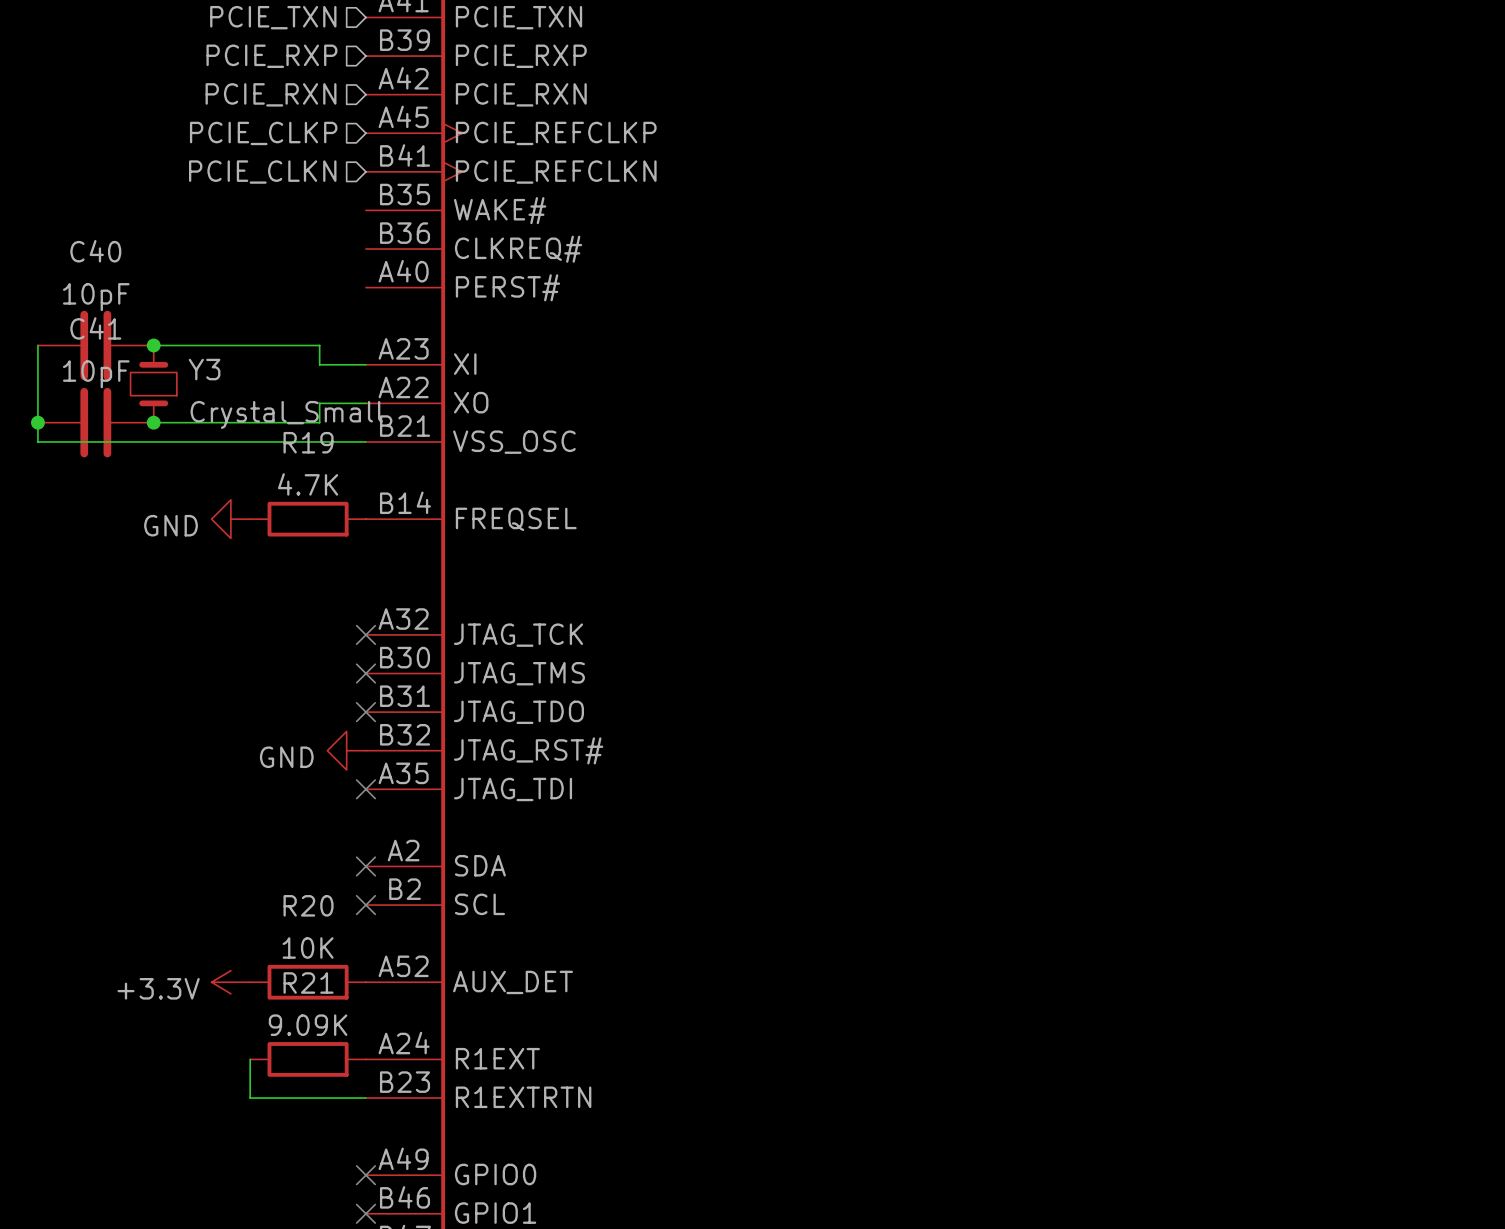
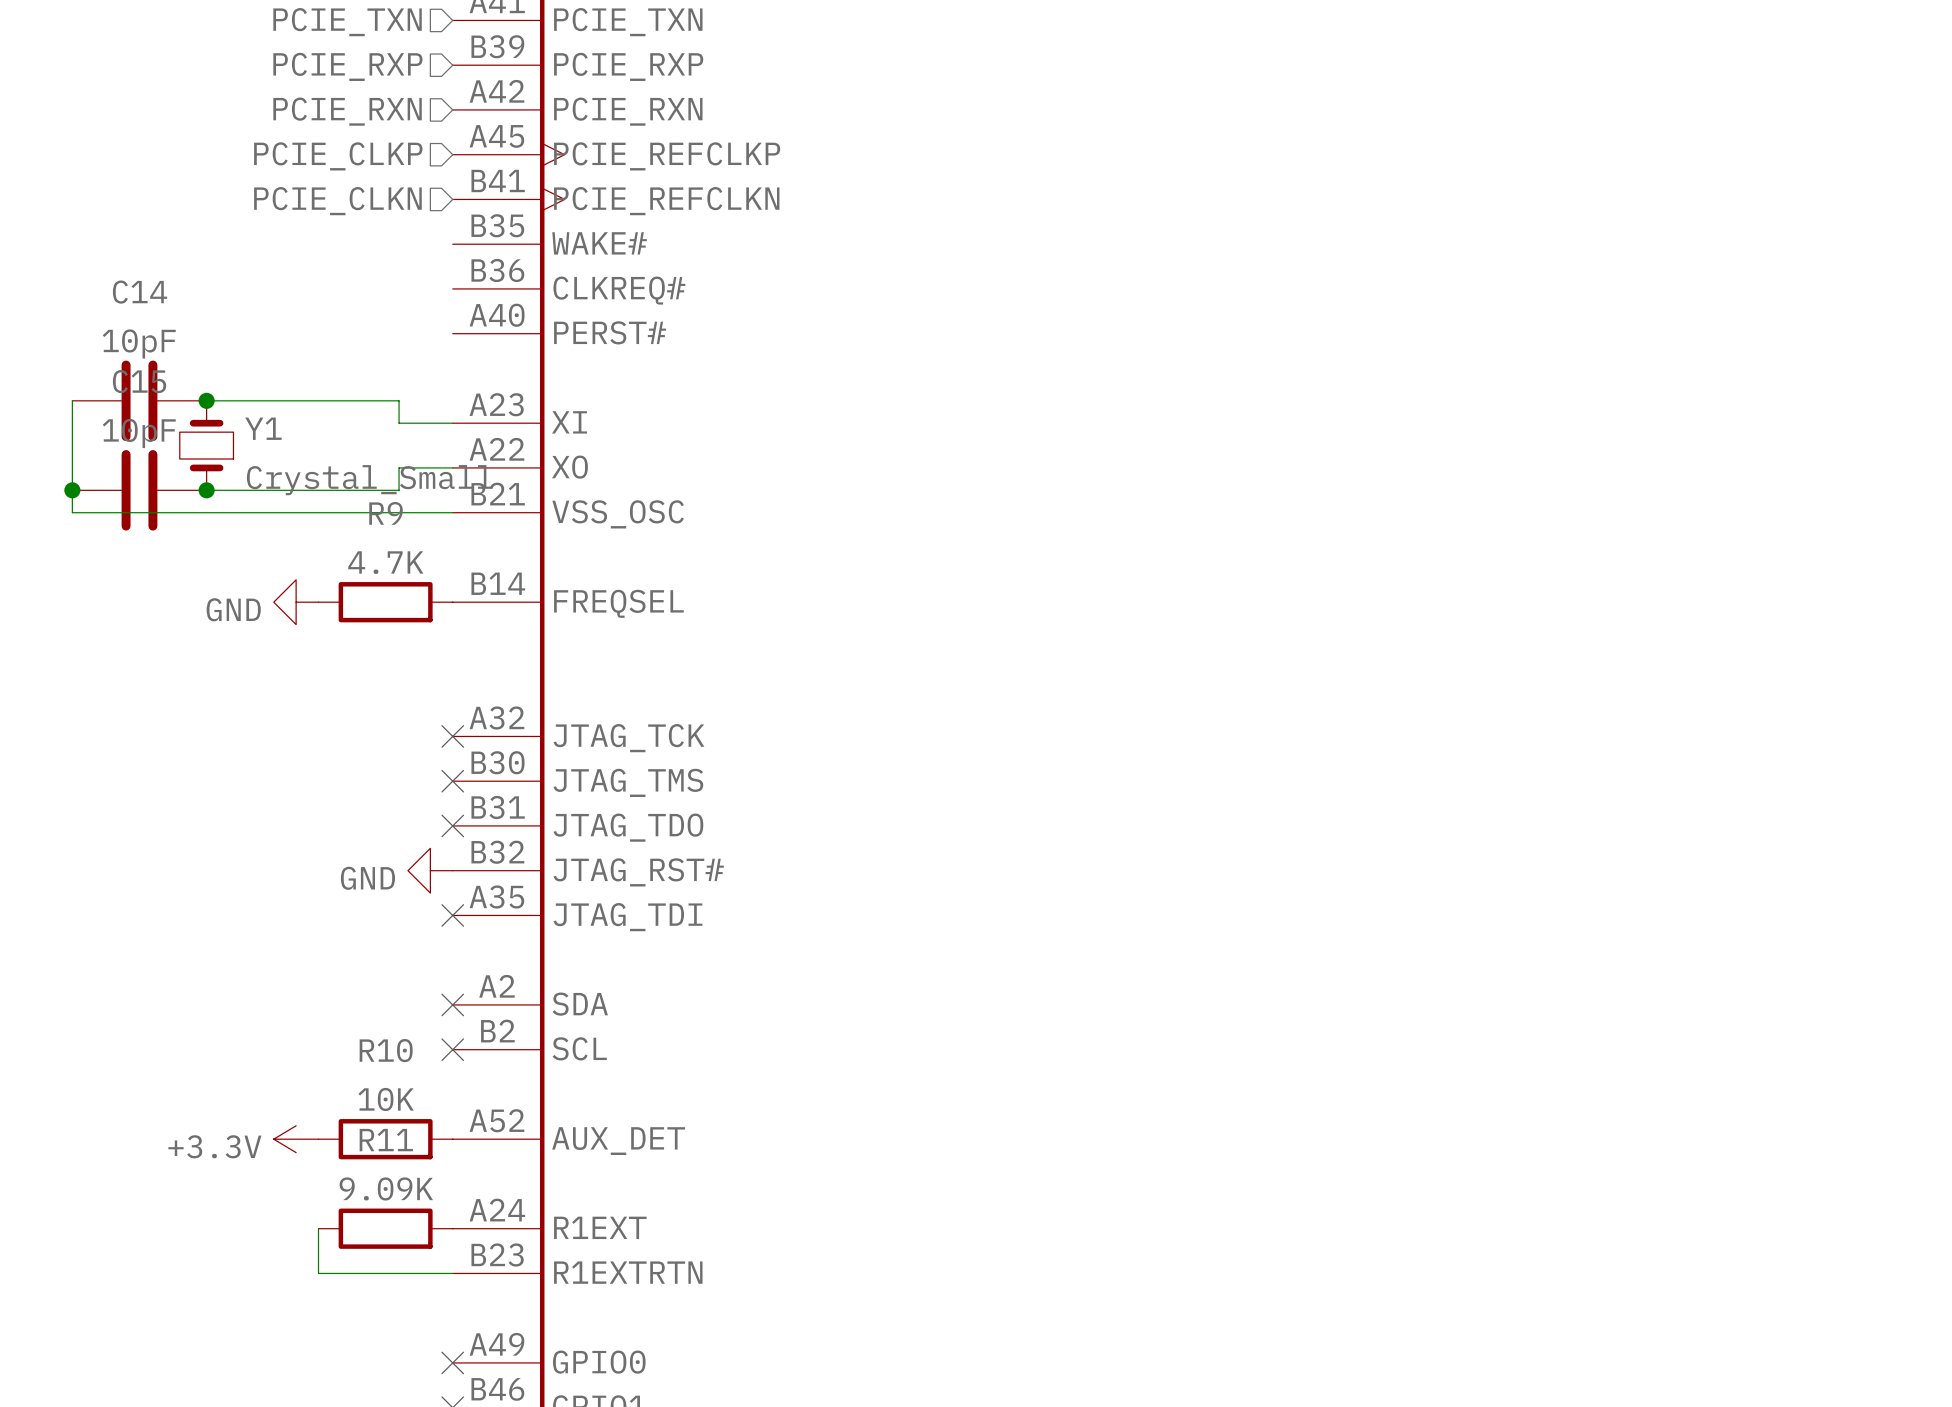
C40 name: C40 (95, 251) -> C14 (140, 292)
C41 name: C41 (95, 328) -> C15 (139, 381)
Y3 name: Y3 (204, 369) -> Y1 (263, 428)
R19 name: R19 (308, 442) -> R9 (386, 513)
R20 name: R20 (308, 905) -> R10 (386, 1050)
R21 name: R21 (308, 983) -> R11 (386, 1140)

